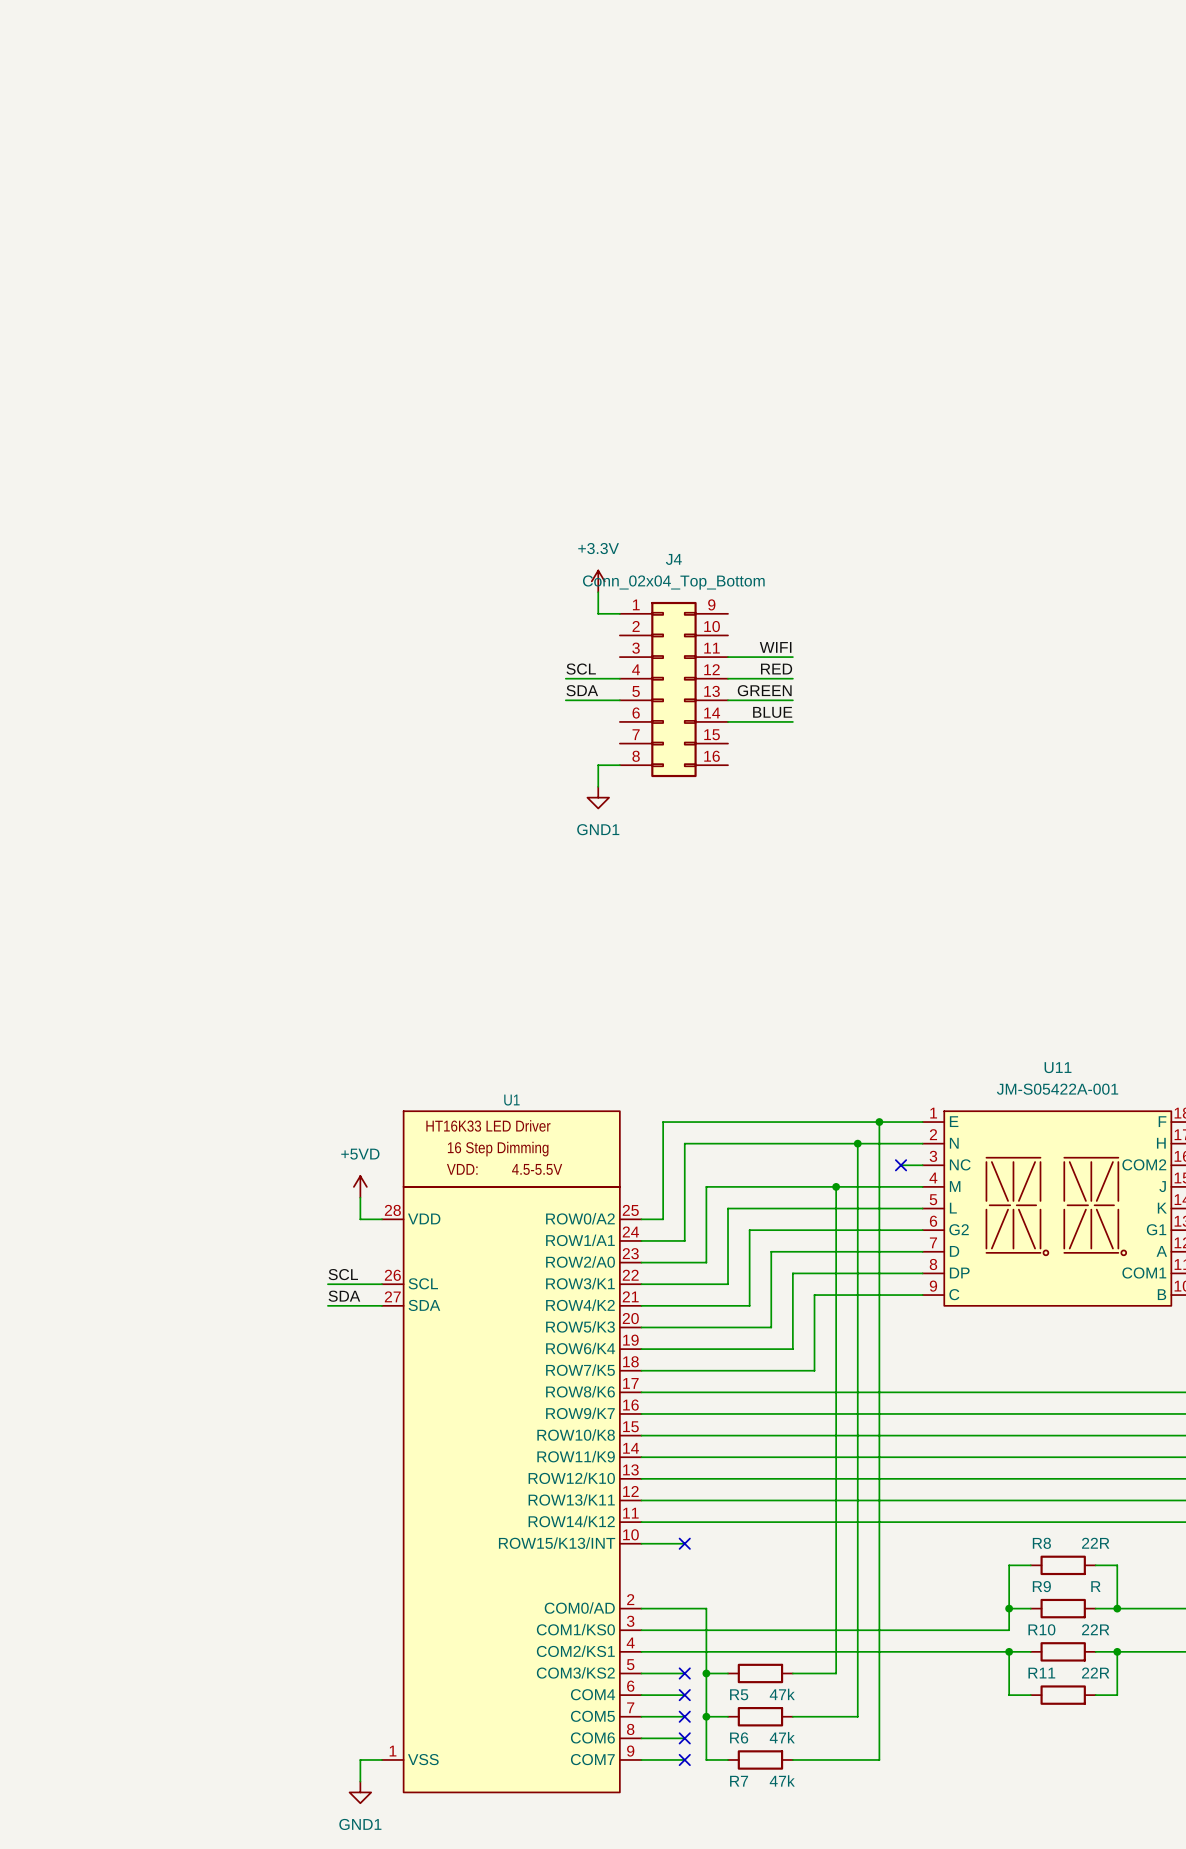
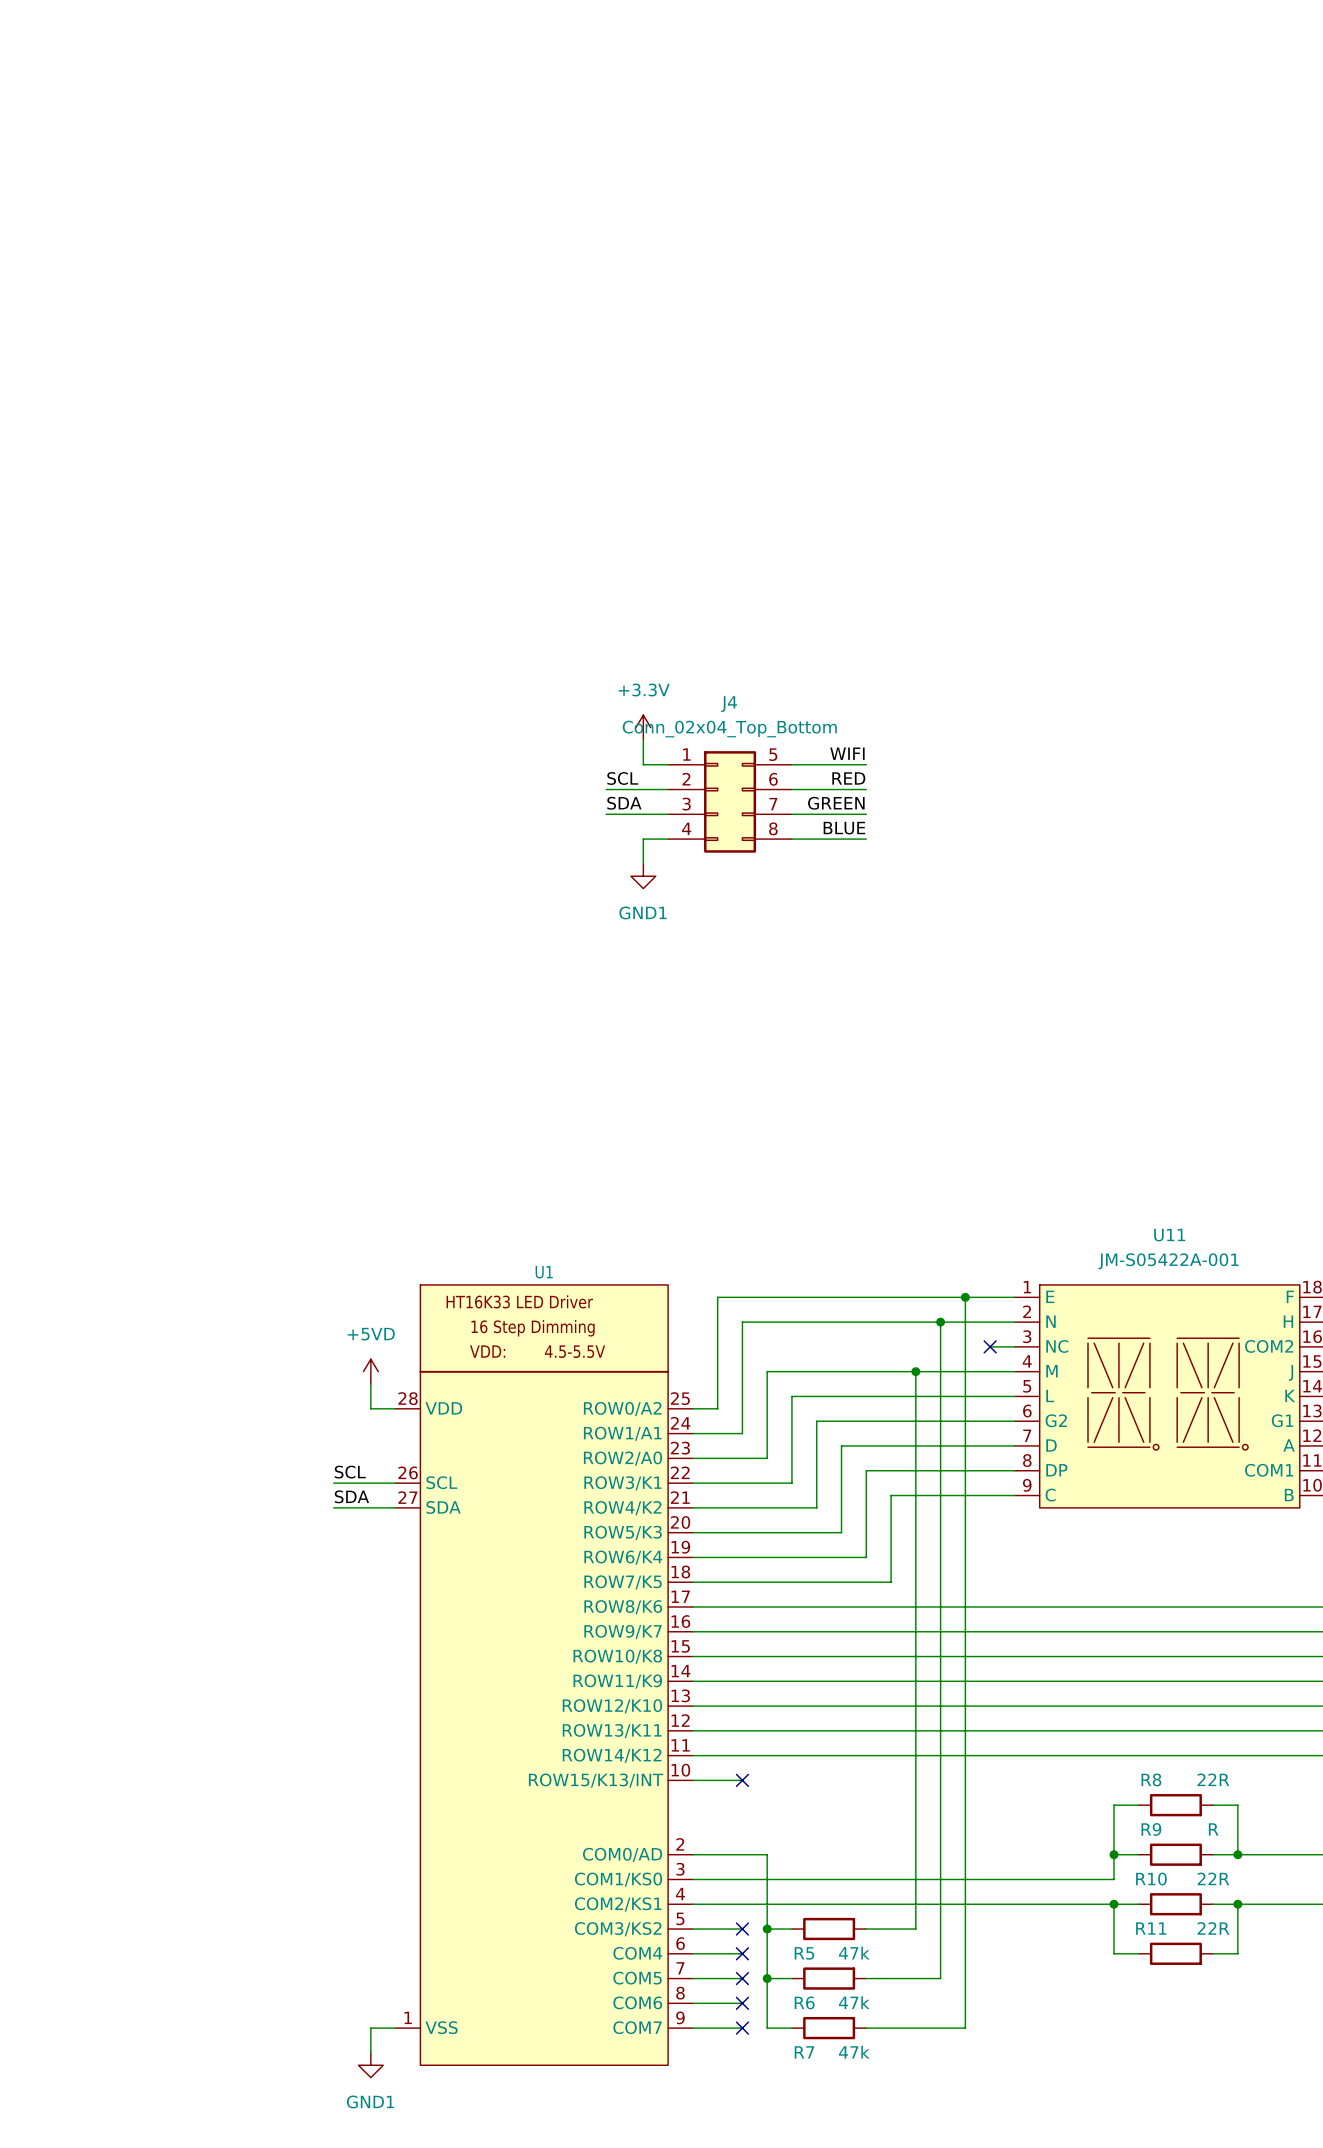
J4 name position: J4 (673, 559) -> J4 (729, 704)
power symbol position: +3.3V (598, 581) -> +3.3V (643, 727)
J4 value position: Conn_02x04_Top_Bottom (673, 582) -> Conn_02x04_Top_Bottom (729, 729)
wire: (598, 592) (598, 613) (619, 613) -> (643, 739) (643, 764) (668, 764)
J4 symbol: [619, 601, 729, 778] -> [668, 751, 792, 853]
wire: (619, 765) (598, 765) (598, 786) -> (668, 839) (643, 839) (643, 863)
power symbol position: GND1 (598, 797) -> GND1 (643, 876)

